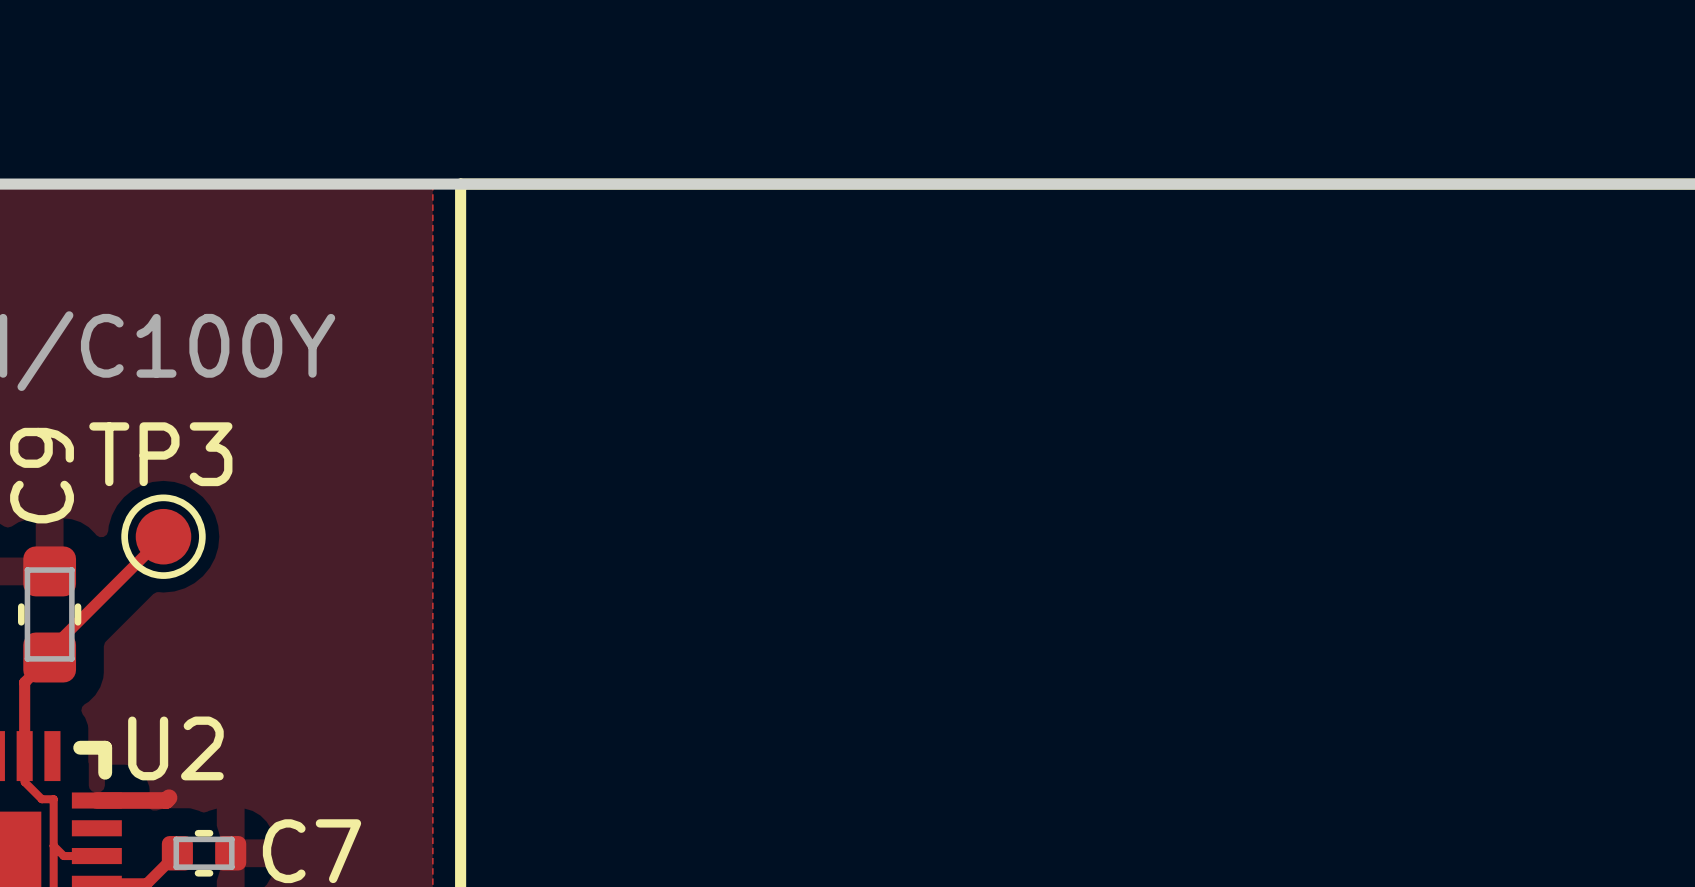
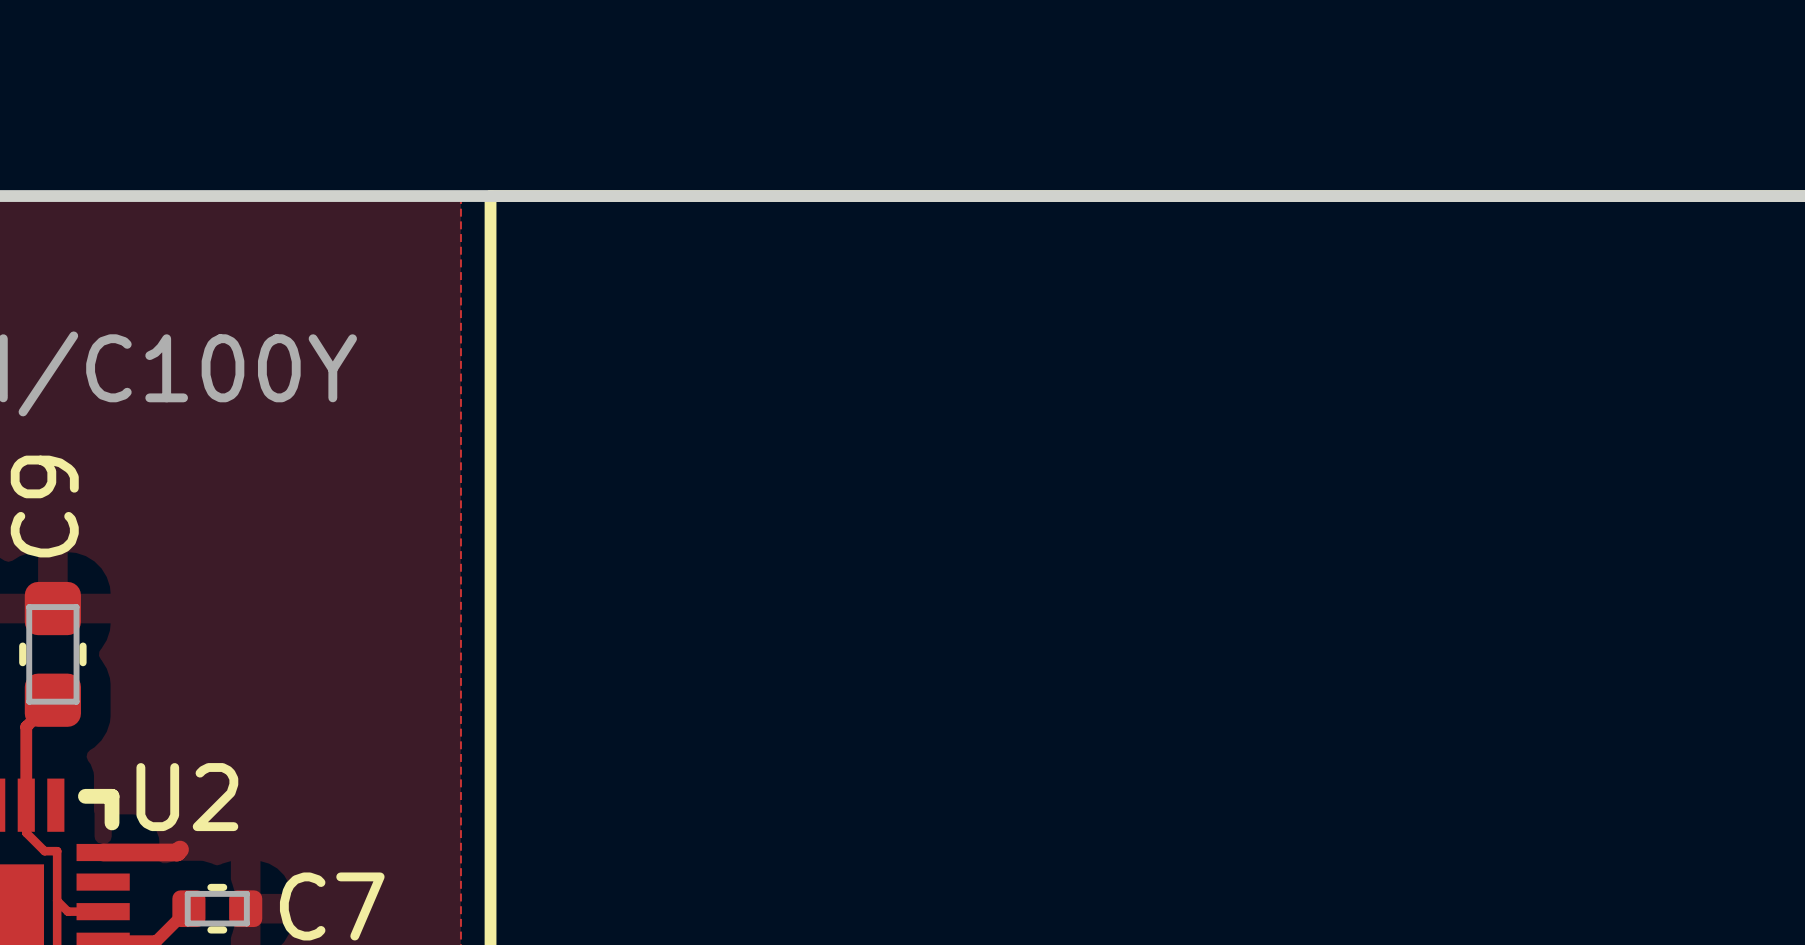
track: (163, 536) (49, 650) (49, 657) -> none
TP3: (163, 536) -> none

